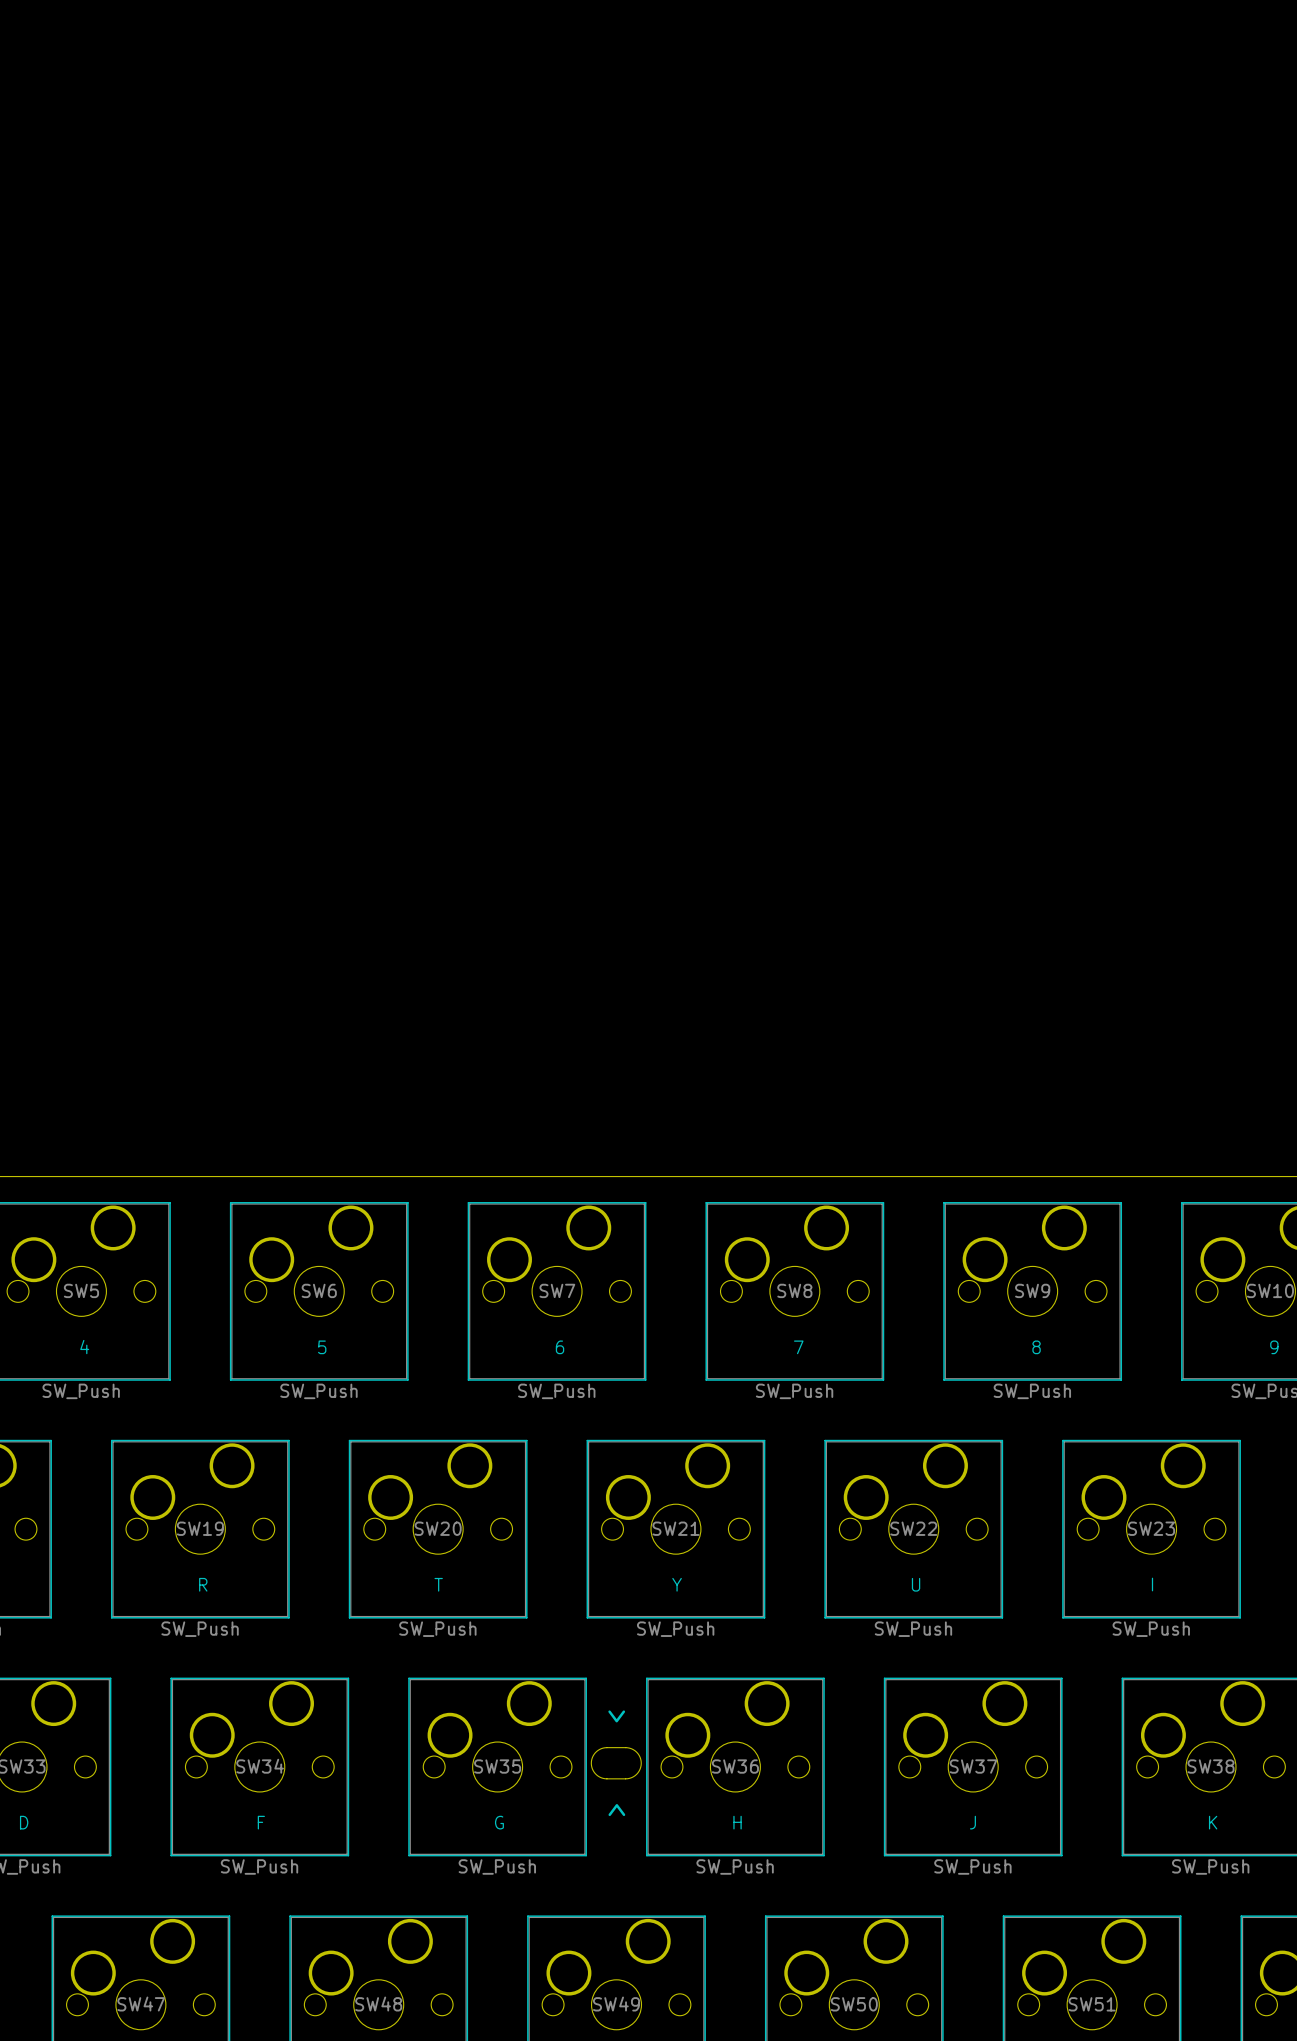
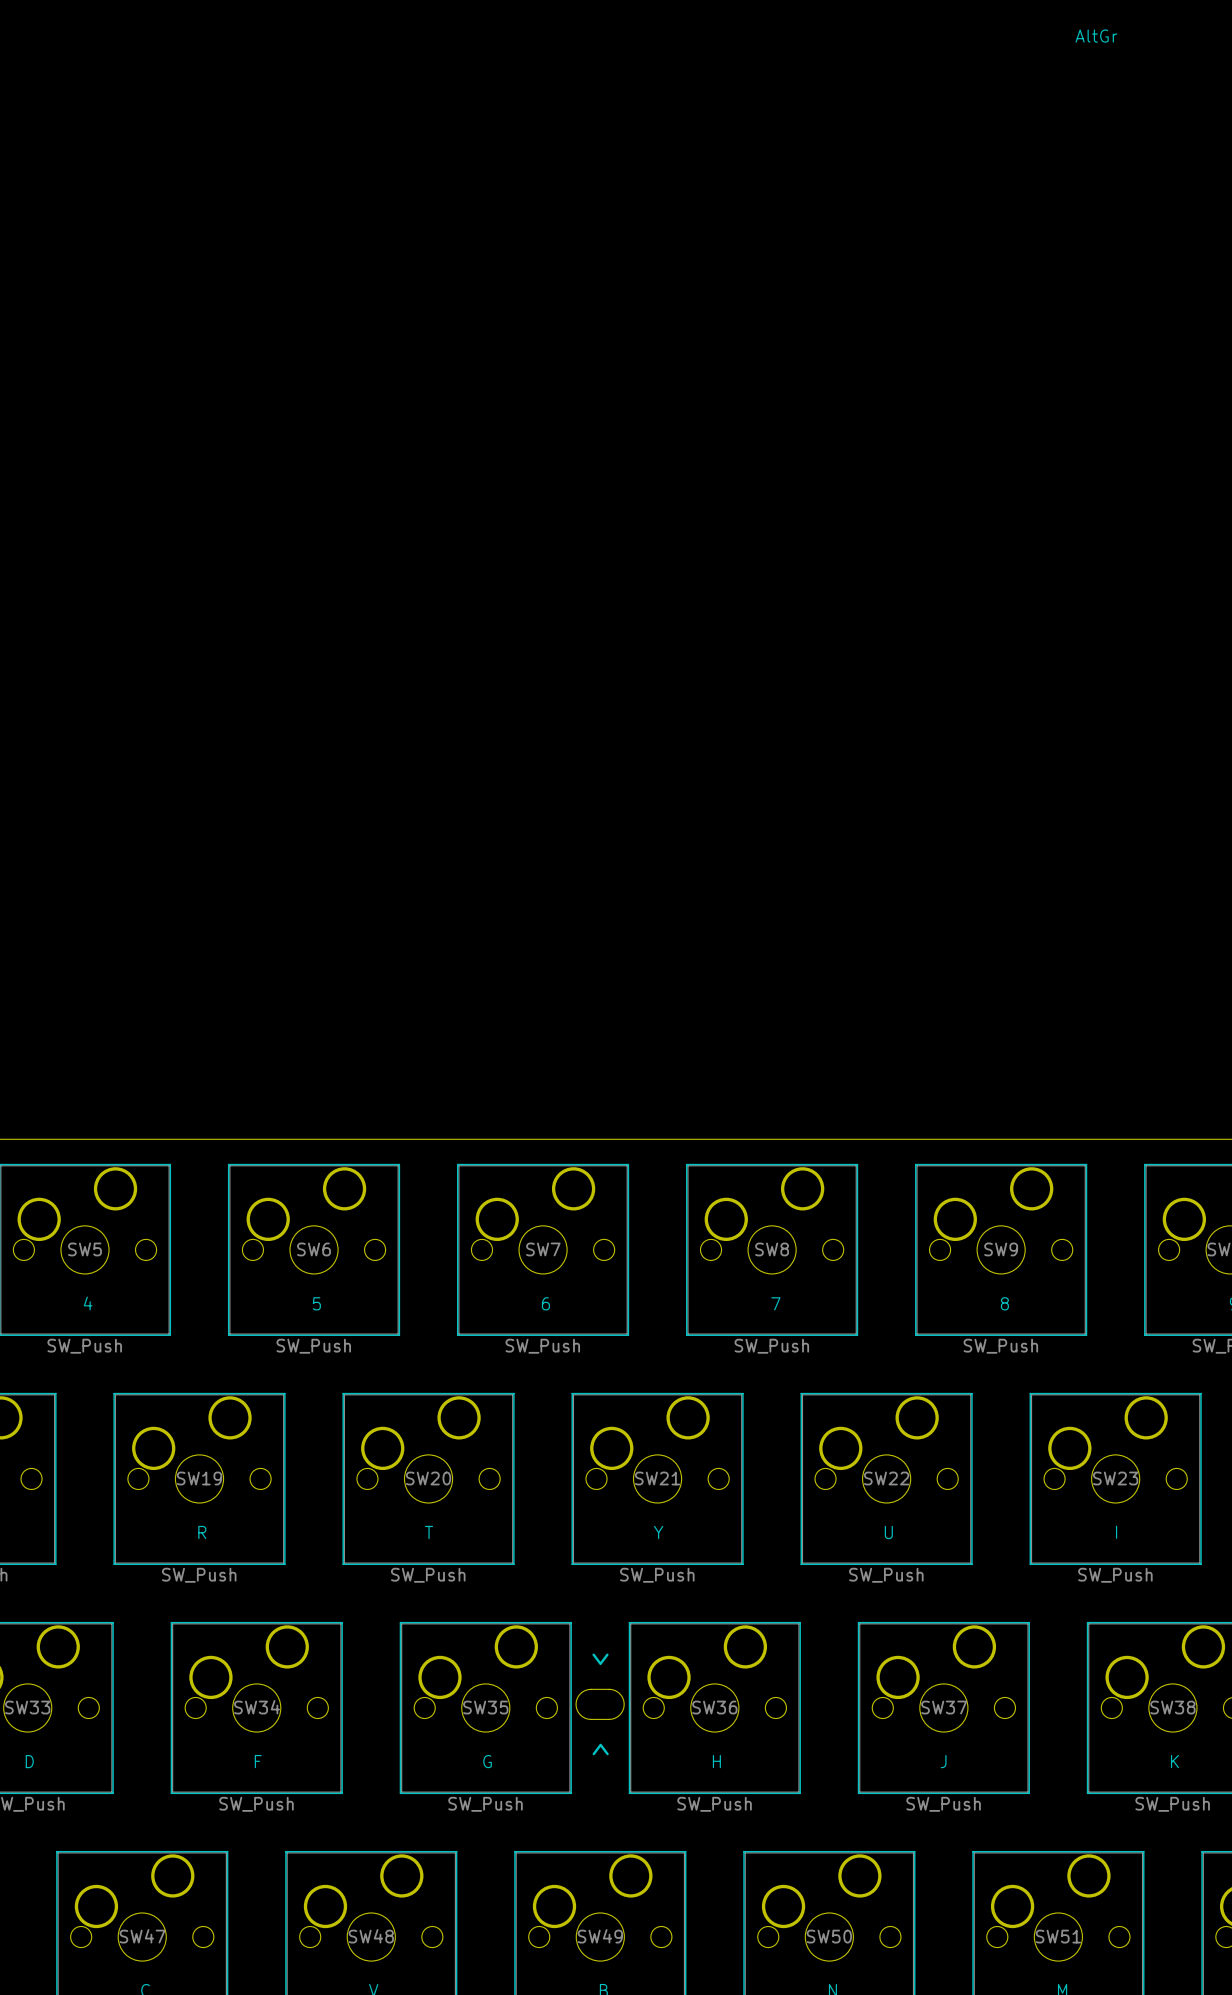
text: none -> AltGr (1096, 36)

